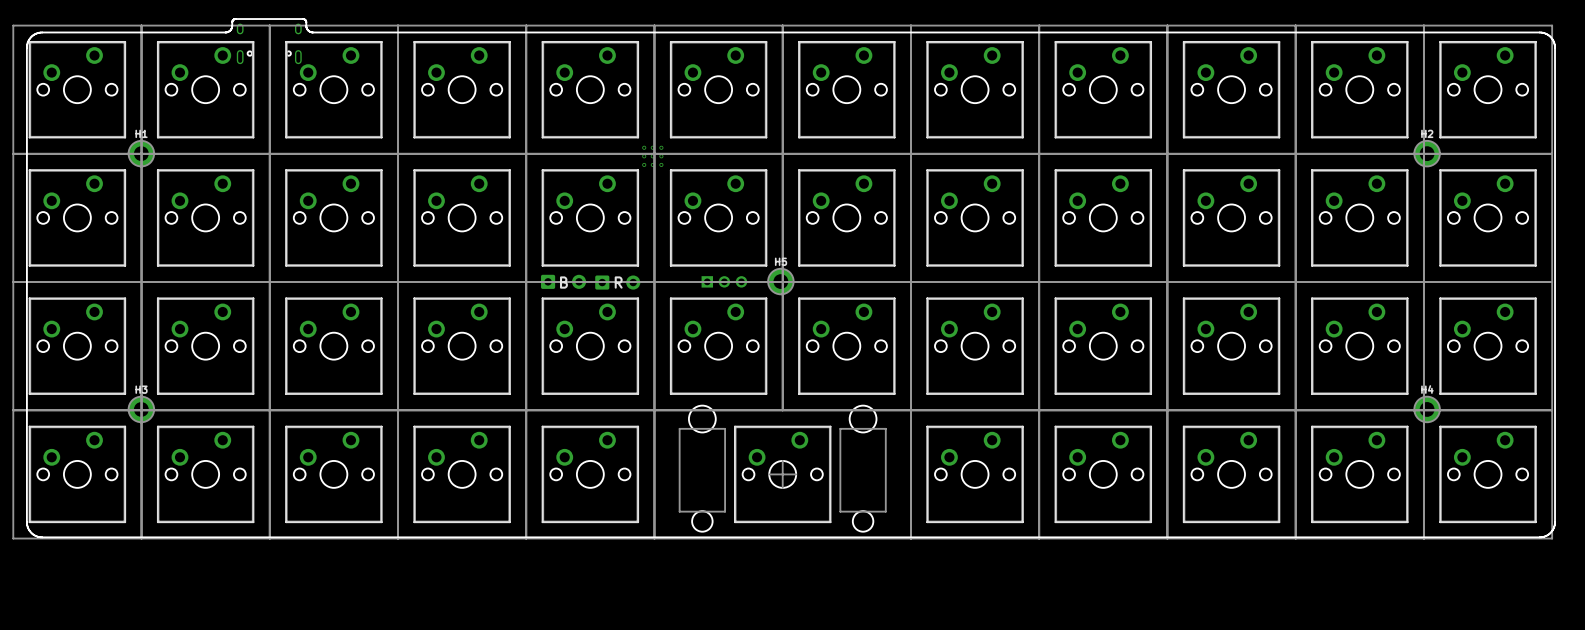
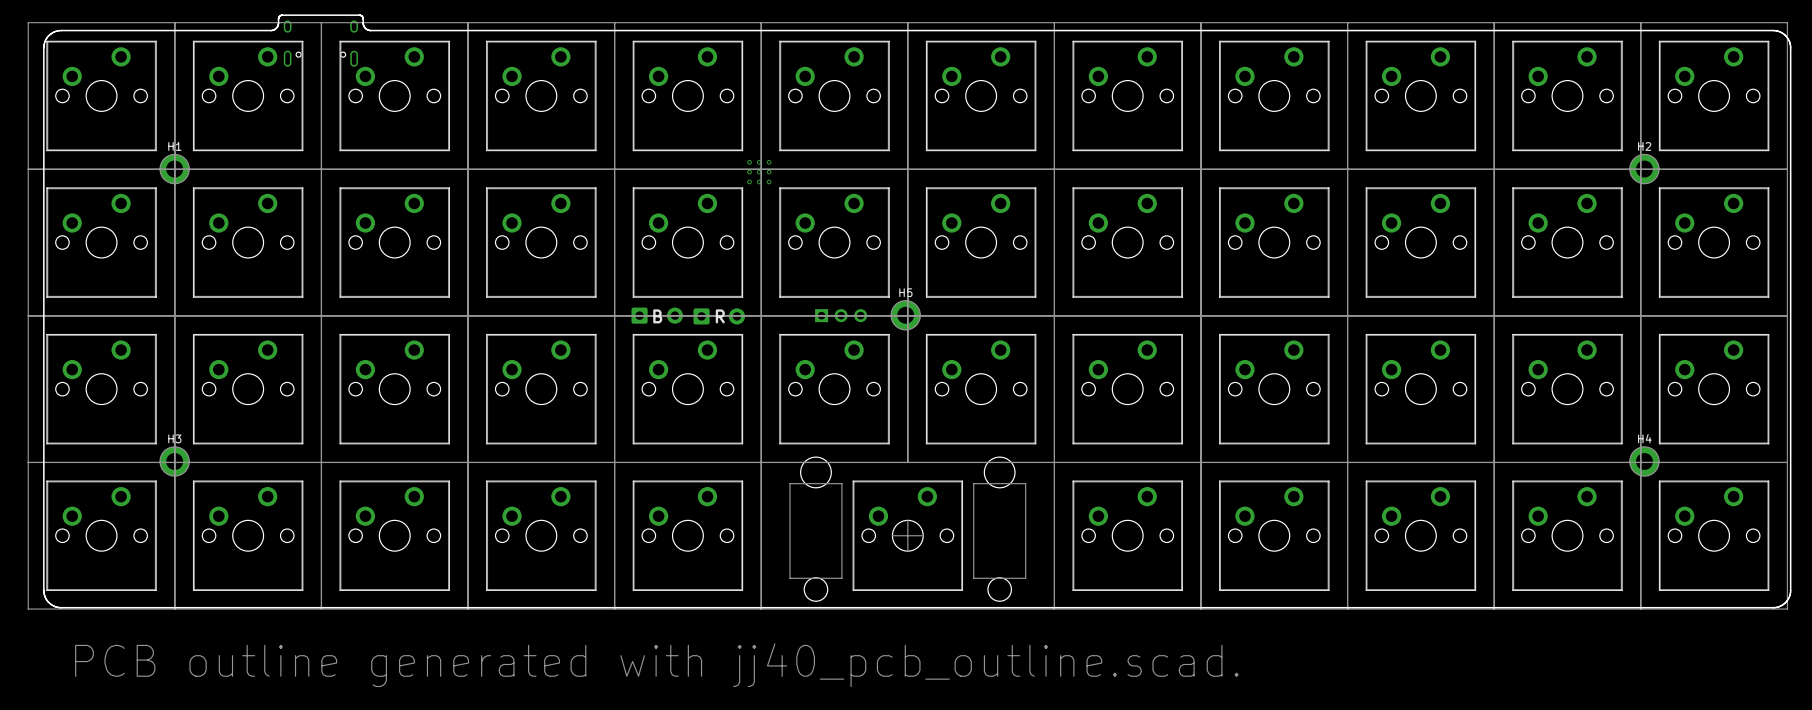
text: none -> PCB outline generated with jj40_pcb_outline.scad. (656, 665)

